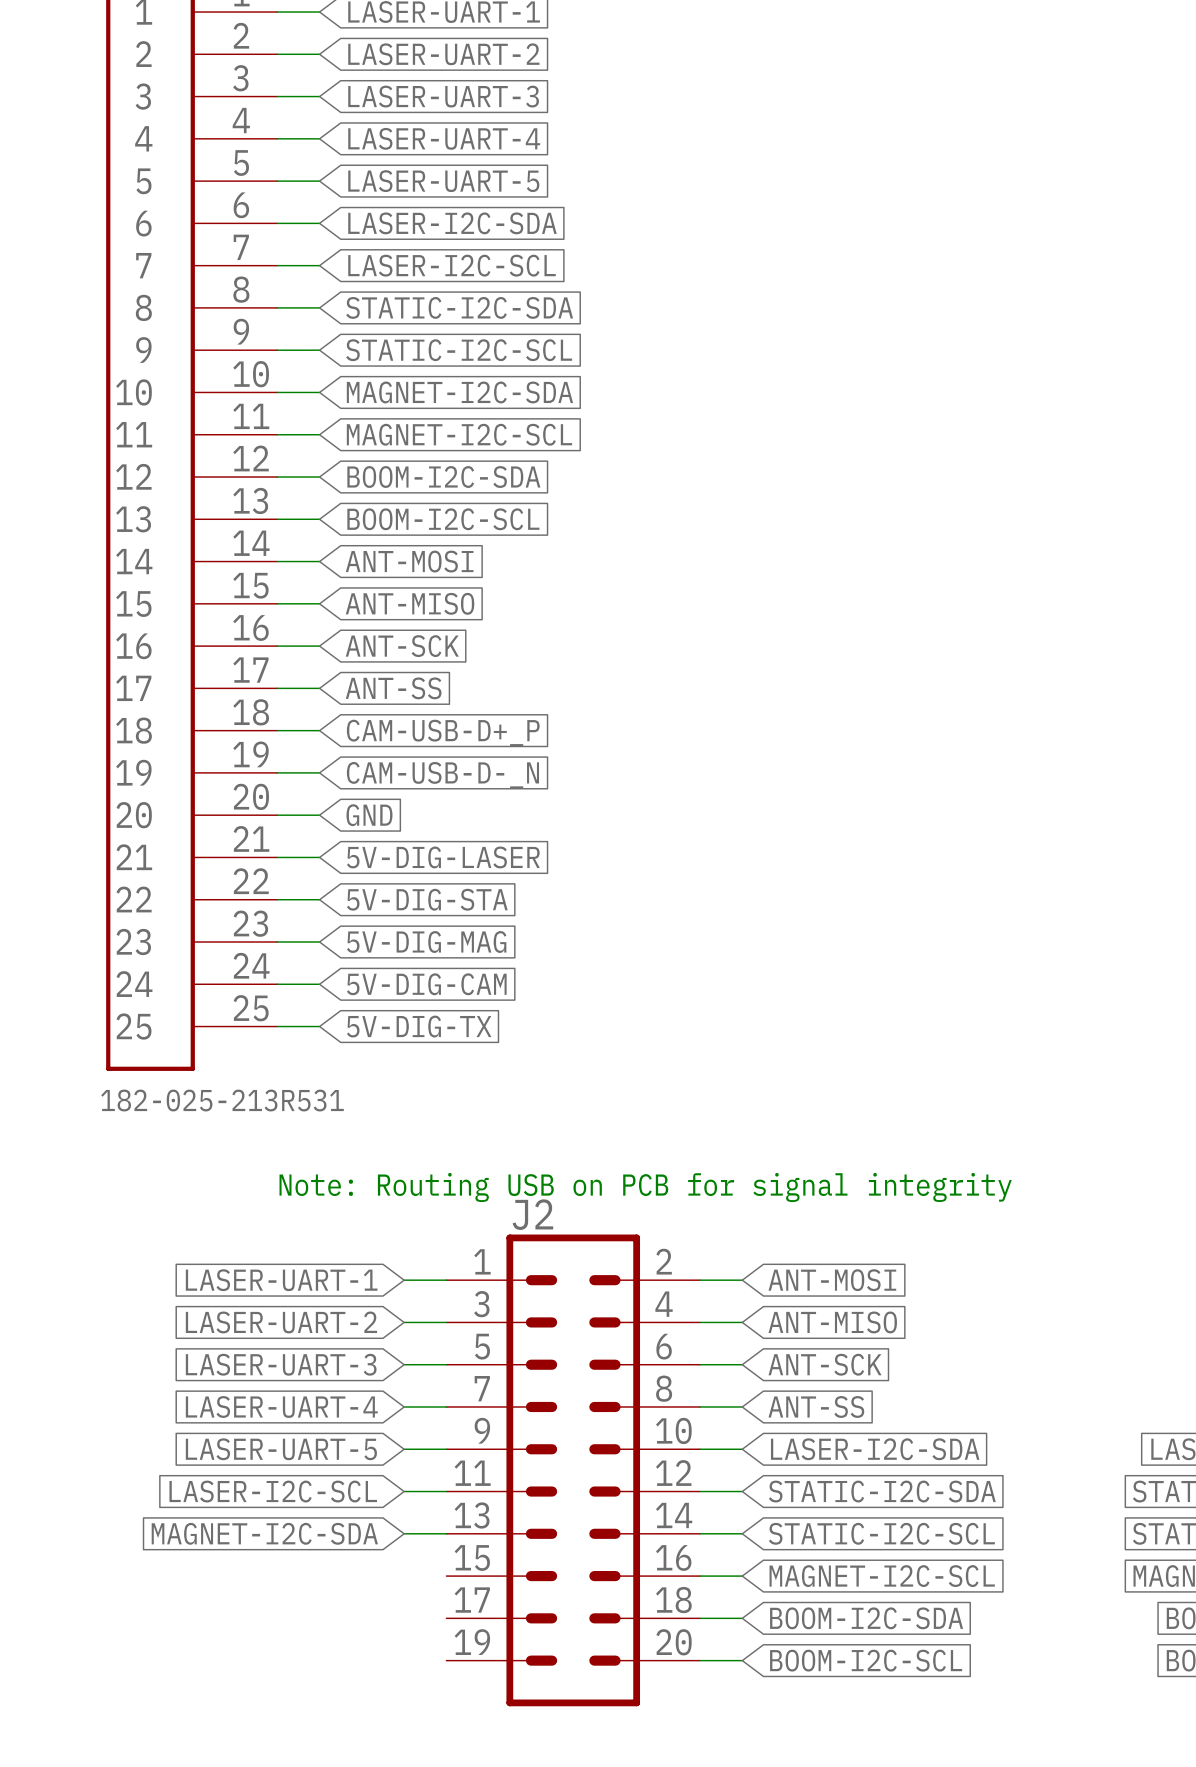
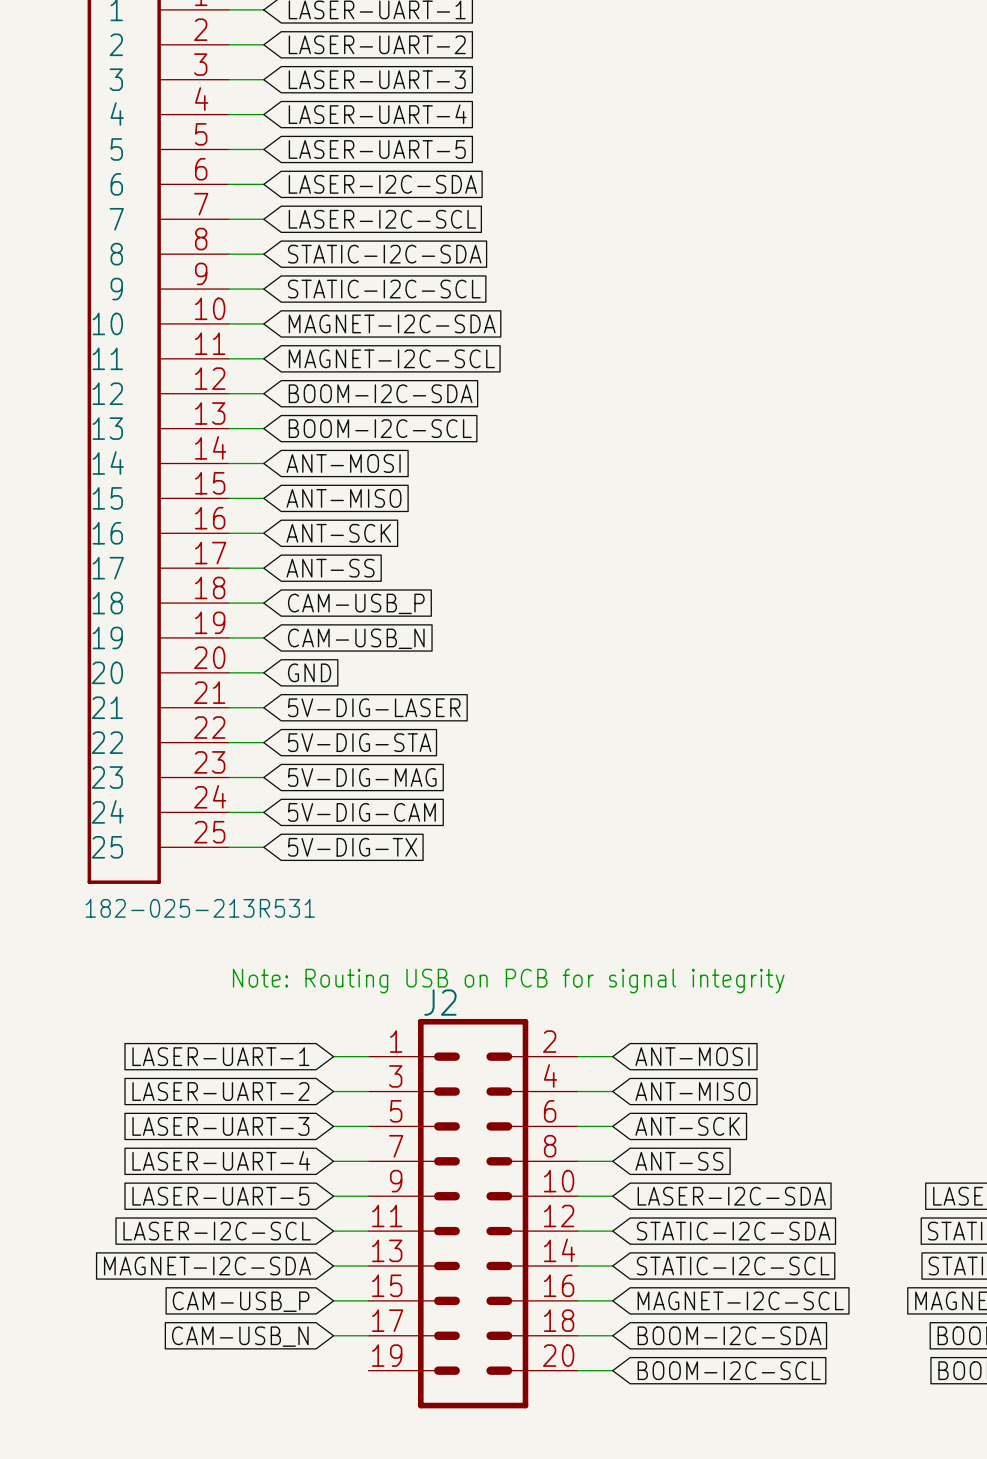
global label: CAM-USB-D+_P (443, 733) -> CAM-USB_P (356, 603)
global label: CAM-USB-D-_N (442, 775) -> CAM-USB_N (356, 638)
wire: none -> (333, 1300) (368, 1300)
global label: none -> CAM-USB_P (241, 1301)
wire: none -> (333, 1335) (368, 1335)
global label: none -> CAM-USB_N (240, 1336)

